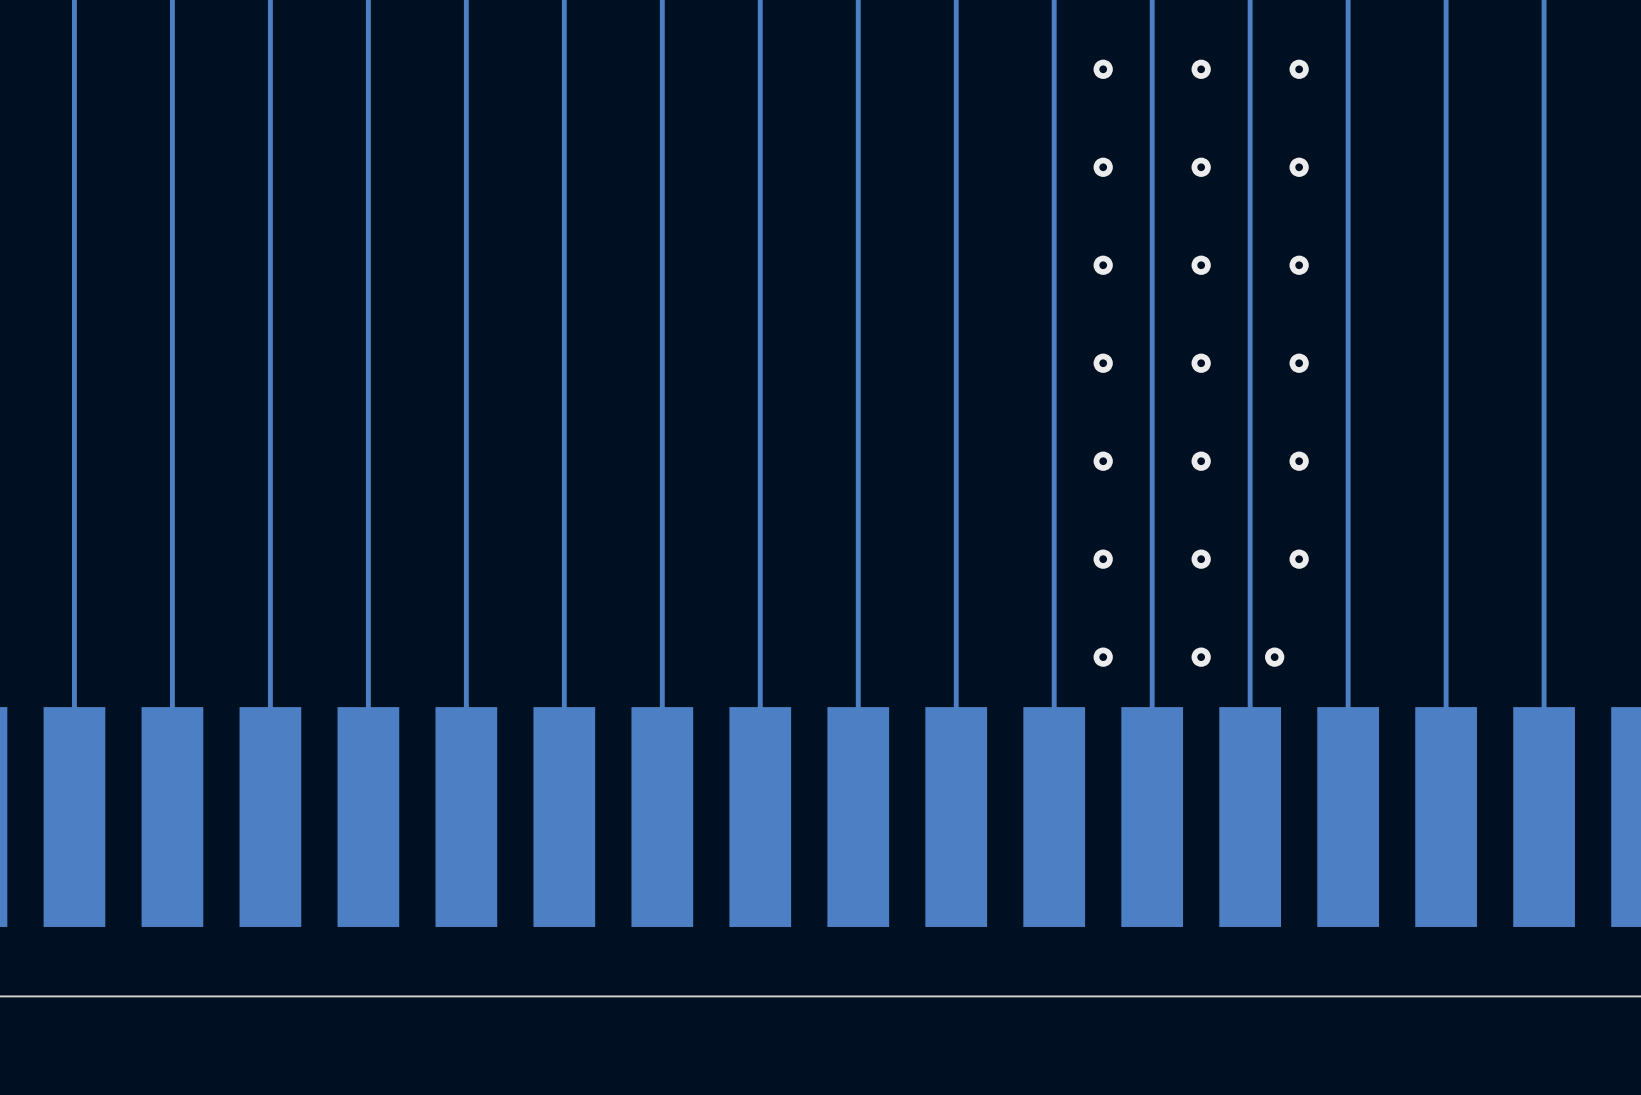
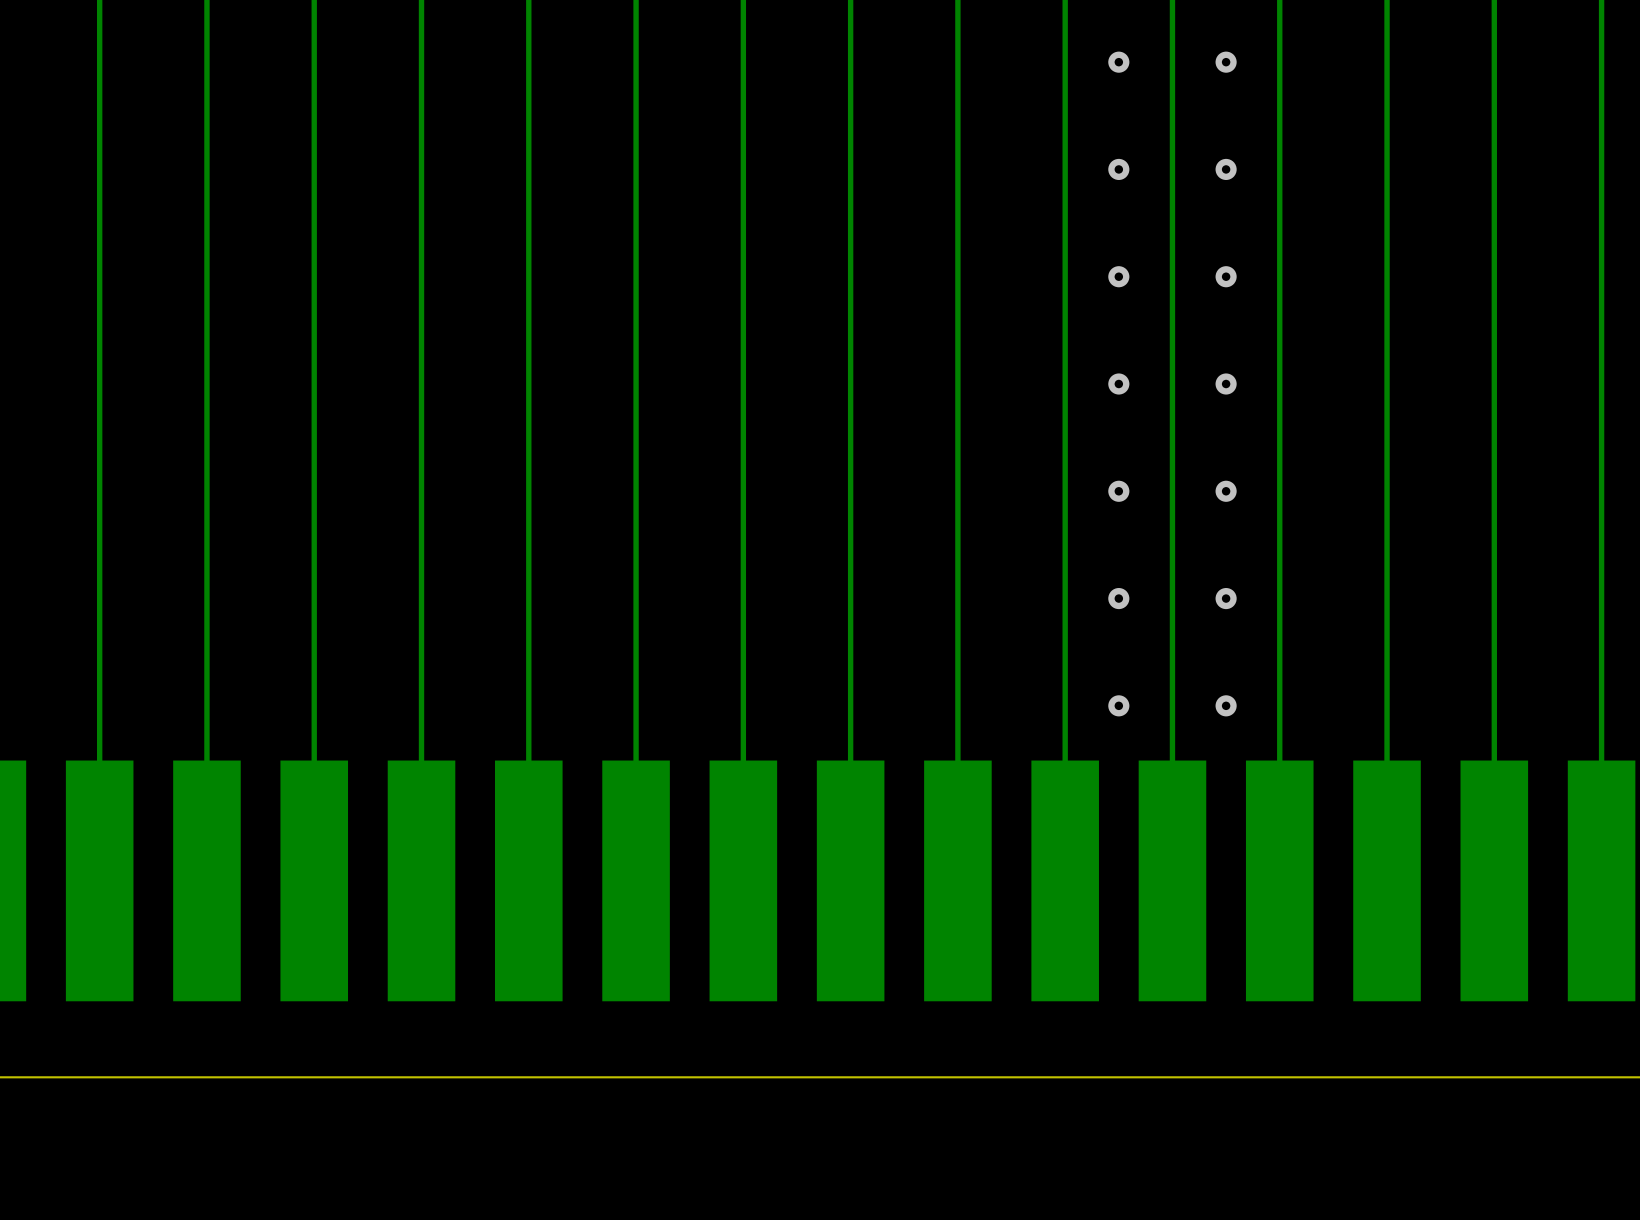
via: (1299, 69) -> none
via: (1299, 167) -> none
via: (1299, 265) -> none
via: (1299, 363) -> none
via: (1299, 461) -> none
via: (1299, 559) -> none
via: (1274, 657) -> none

